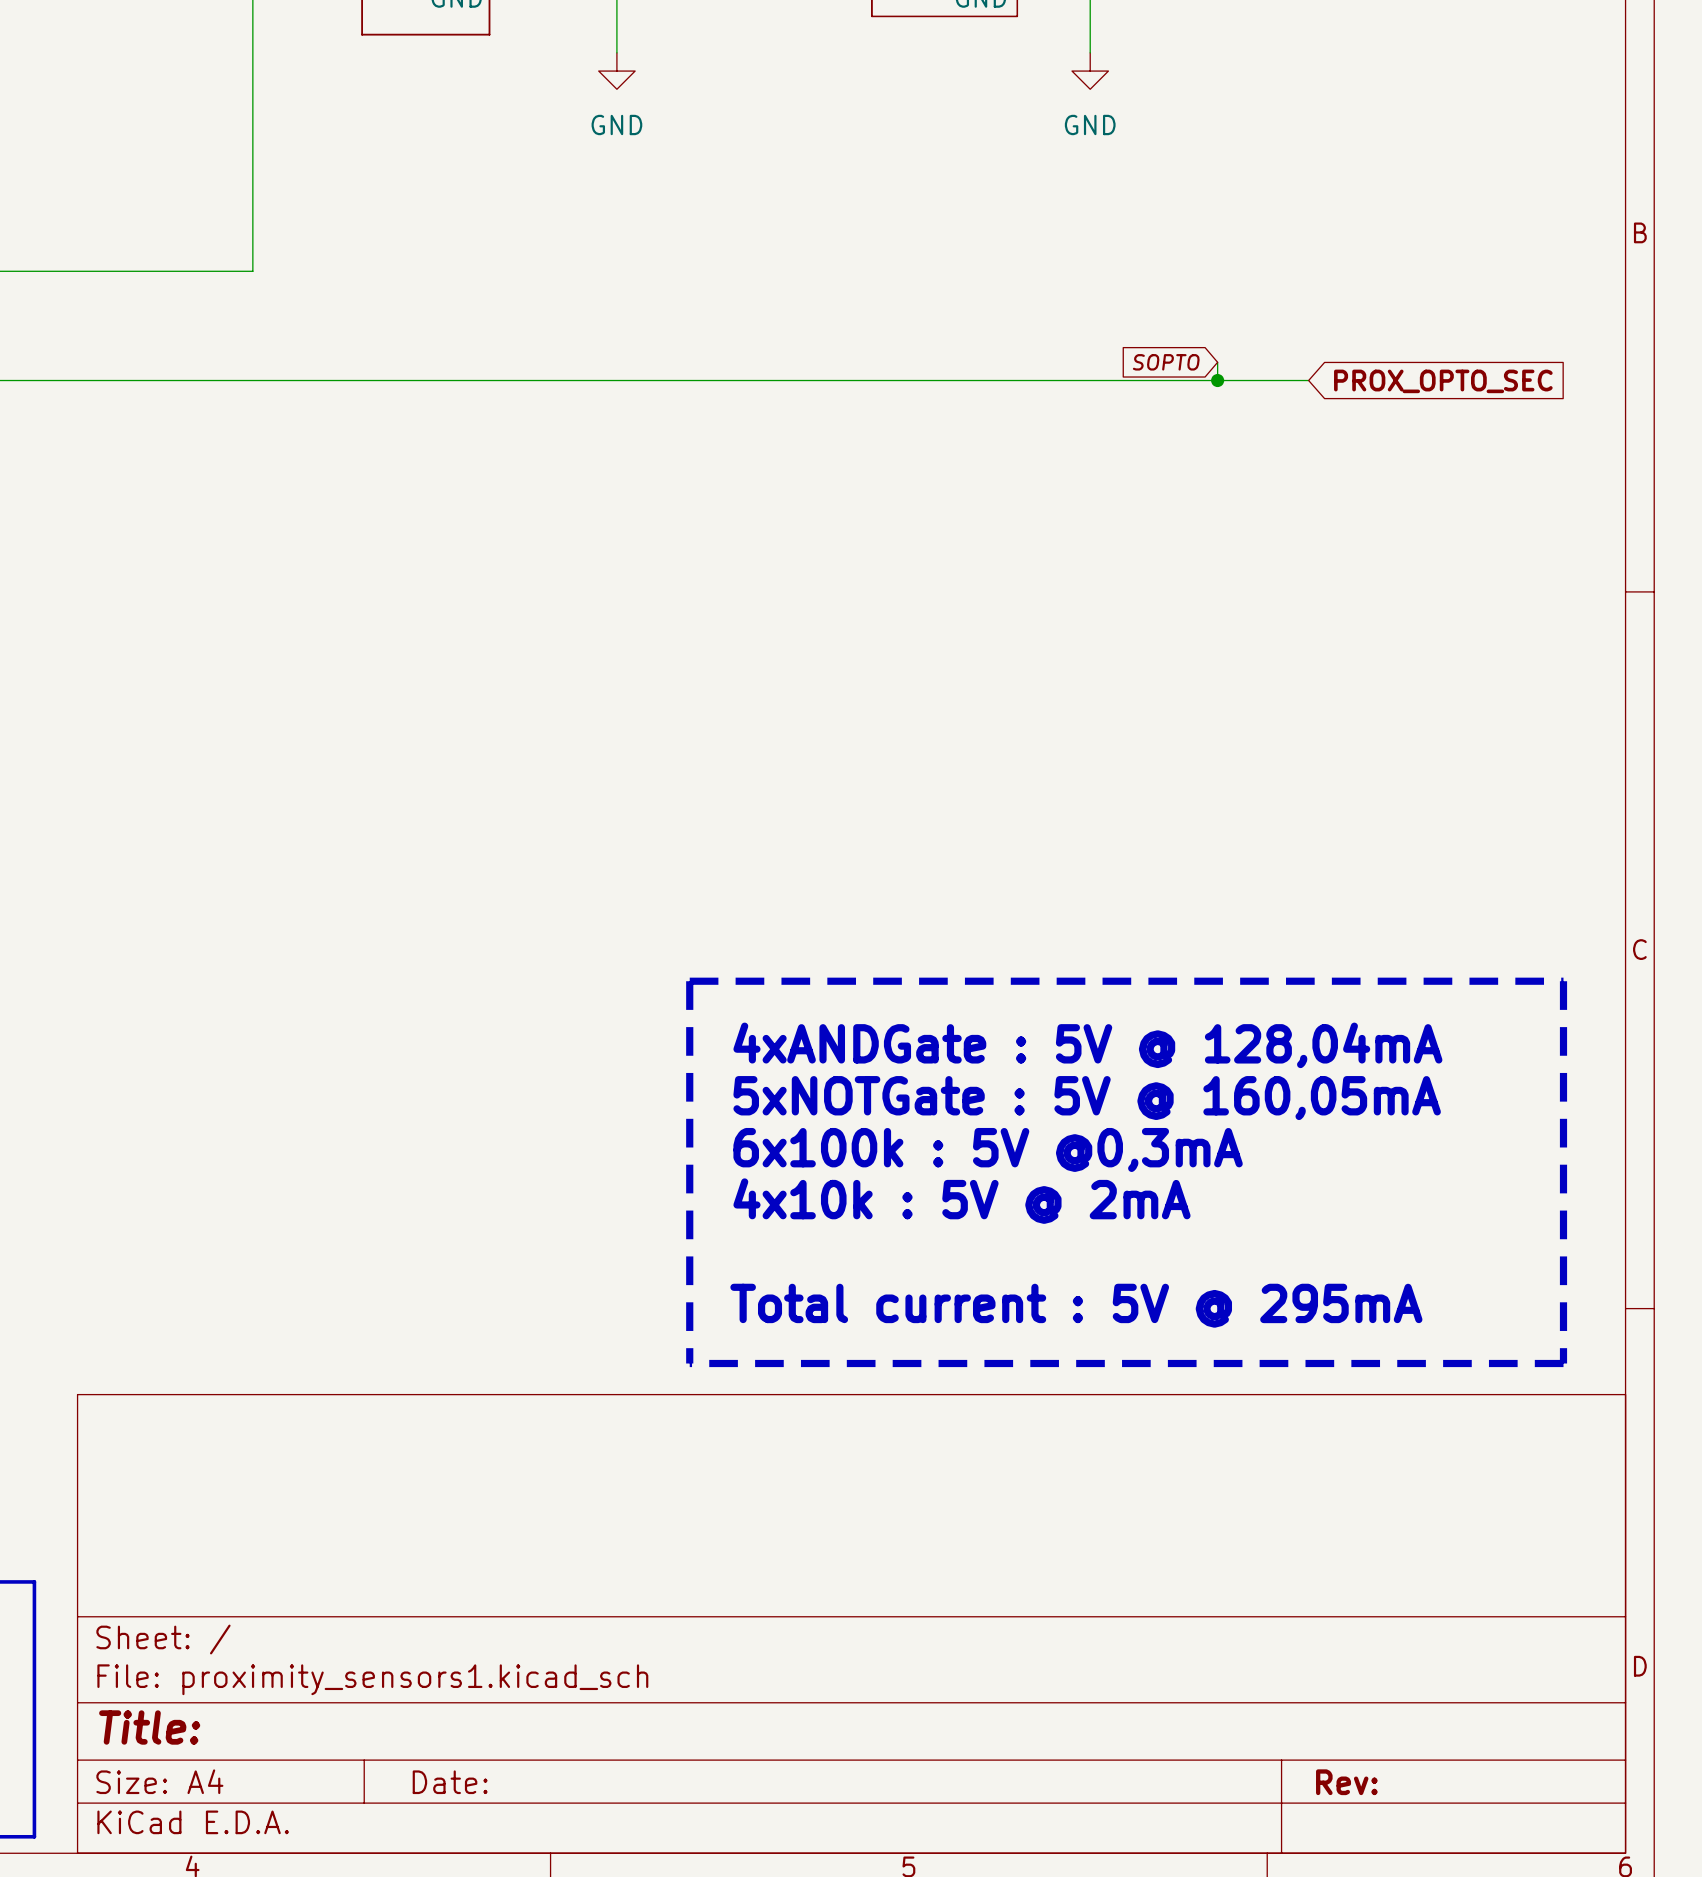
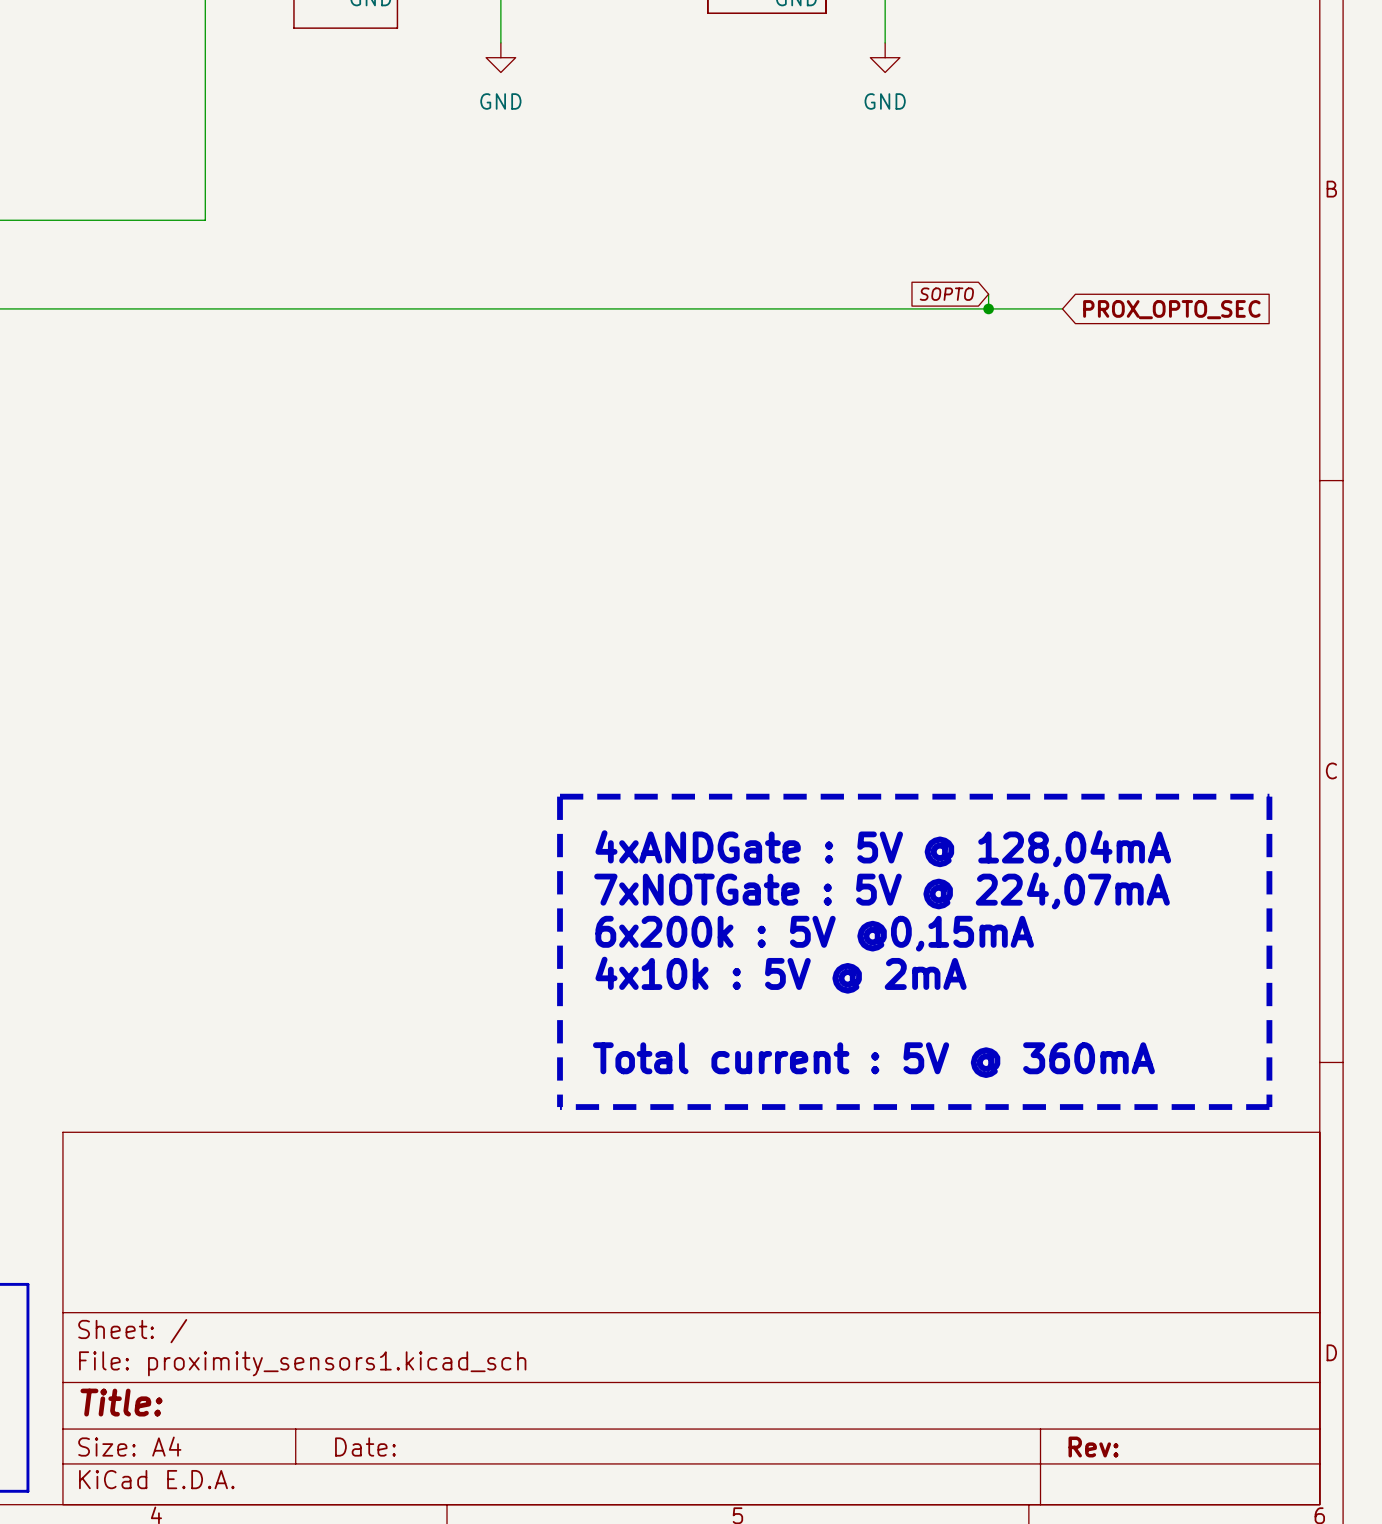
text: 5xNOTGate : 5V @ 160,05mA (1087, 1098) -> 7xNOTGate : 5V @ 224,07mA (882, 890)
text: 6x100k : 5V @0,3mA (988, 1149) -> 6x200k : 5V @0,15mA (814, 933)
text: Total current : 5V @ 295mA (1076, 1305) -> Total current : 5V @ 360mA (873, 1060)

